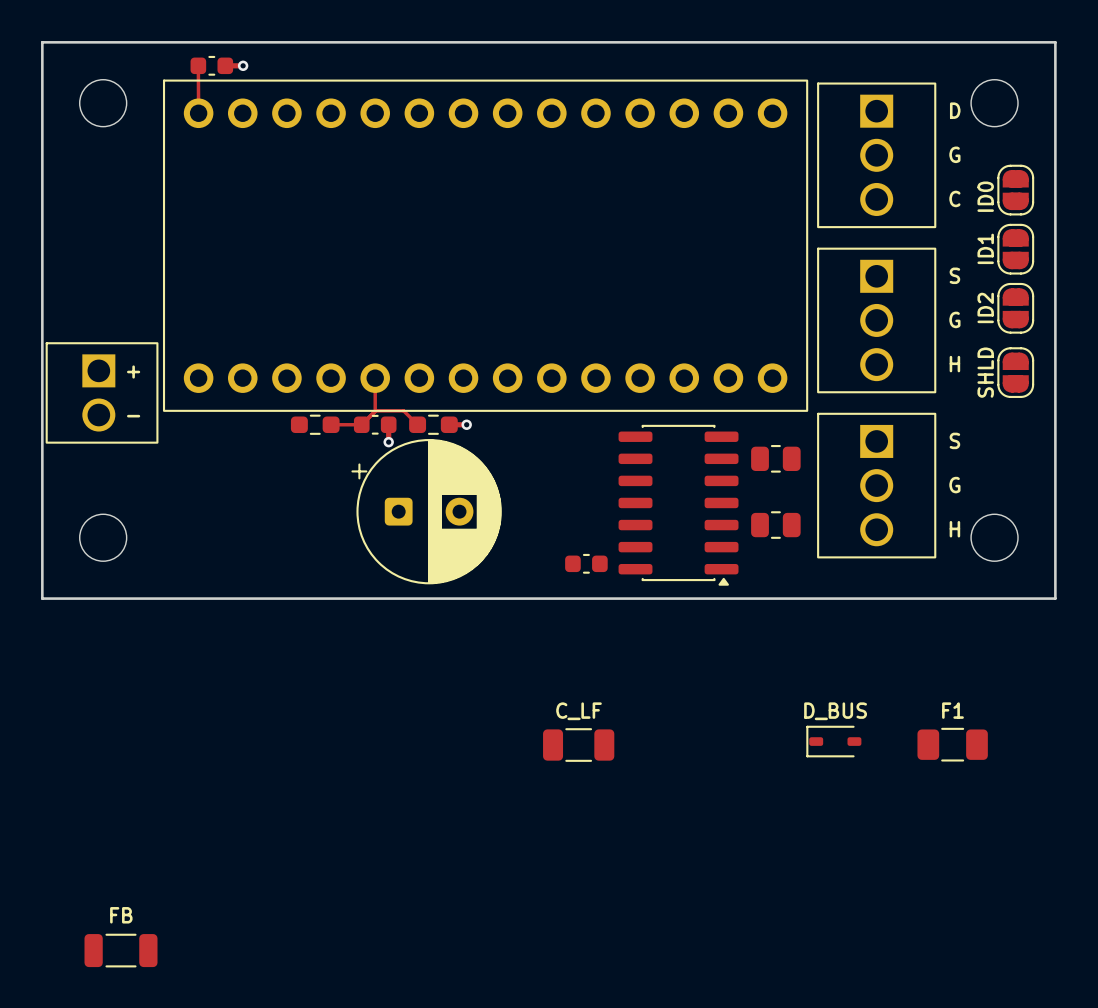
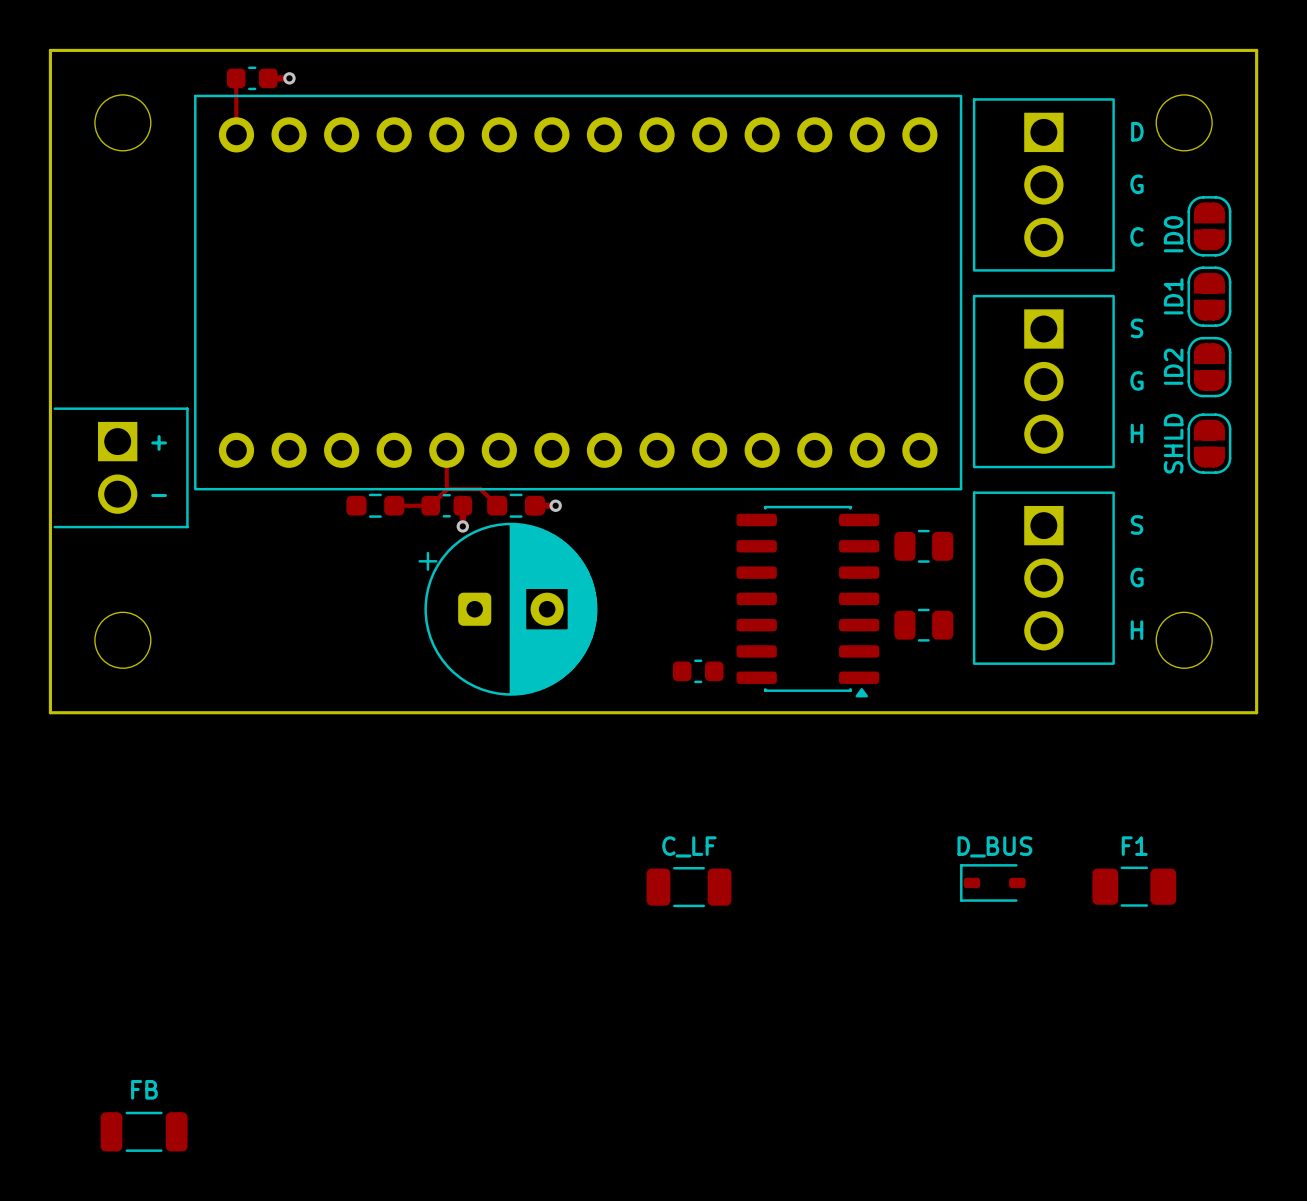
part footprint: [45, 342, 159, 444] -> [53, 407, 189, 529]

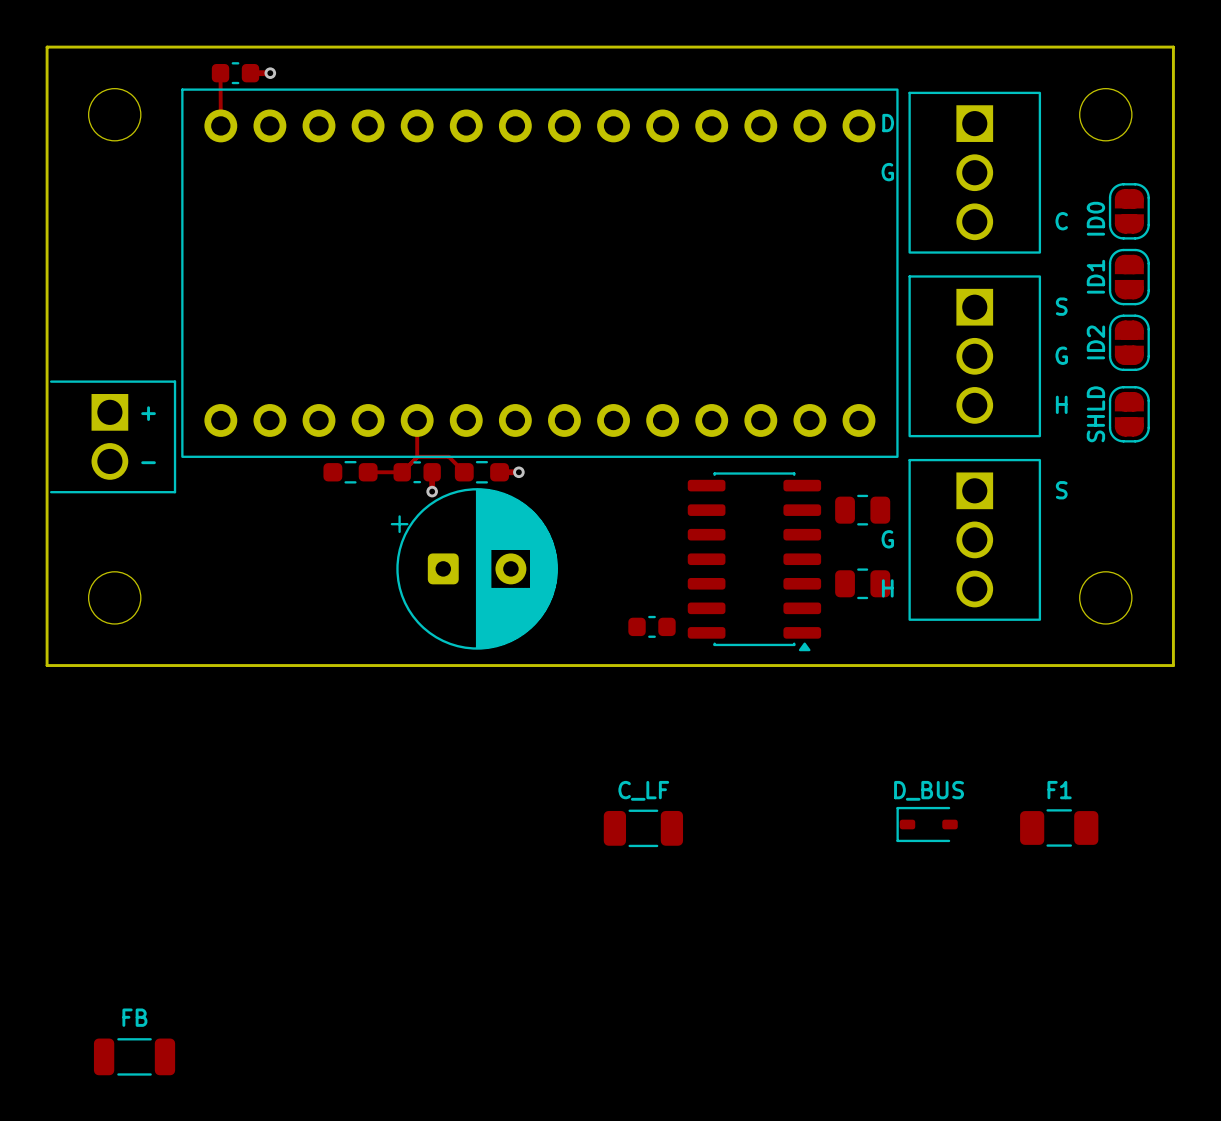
text position: D (1137, 131) -> D (888, 123)
text position: G (1137, 184) -> G (887, 172)
text position: G (1137, 577) -> G (887, 539)
text position: H (1137, 630) -> H (887, 588)

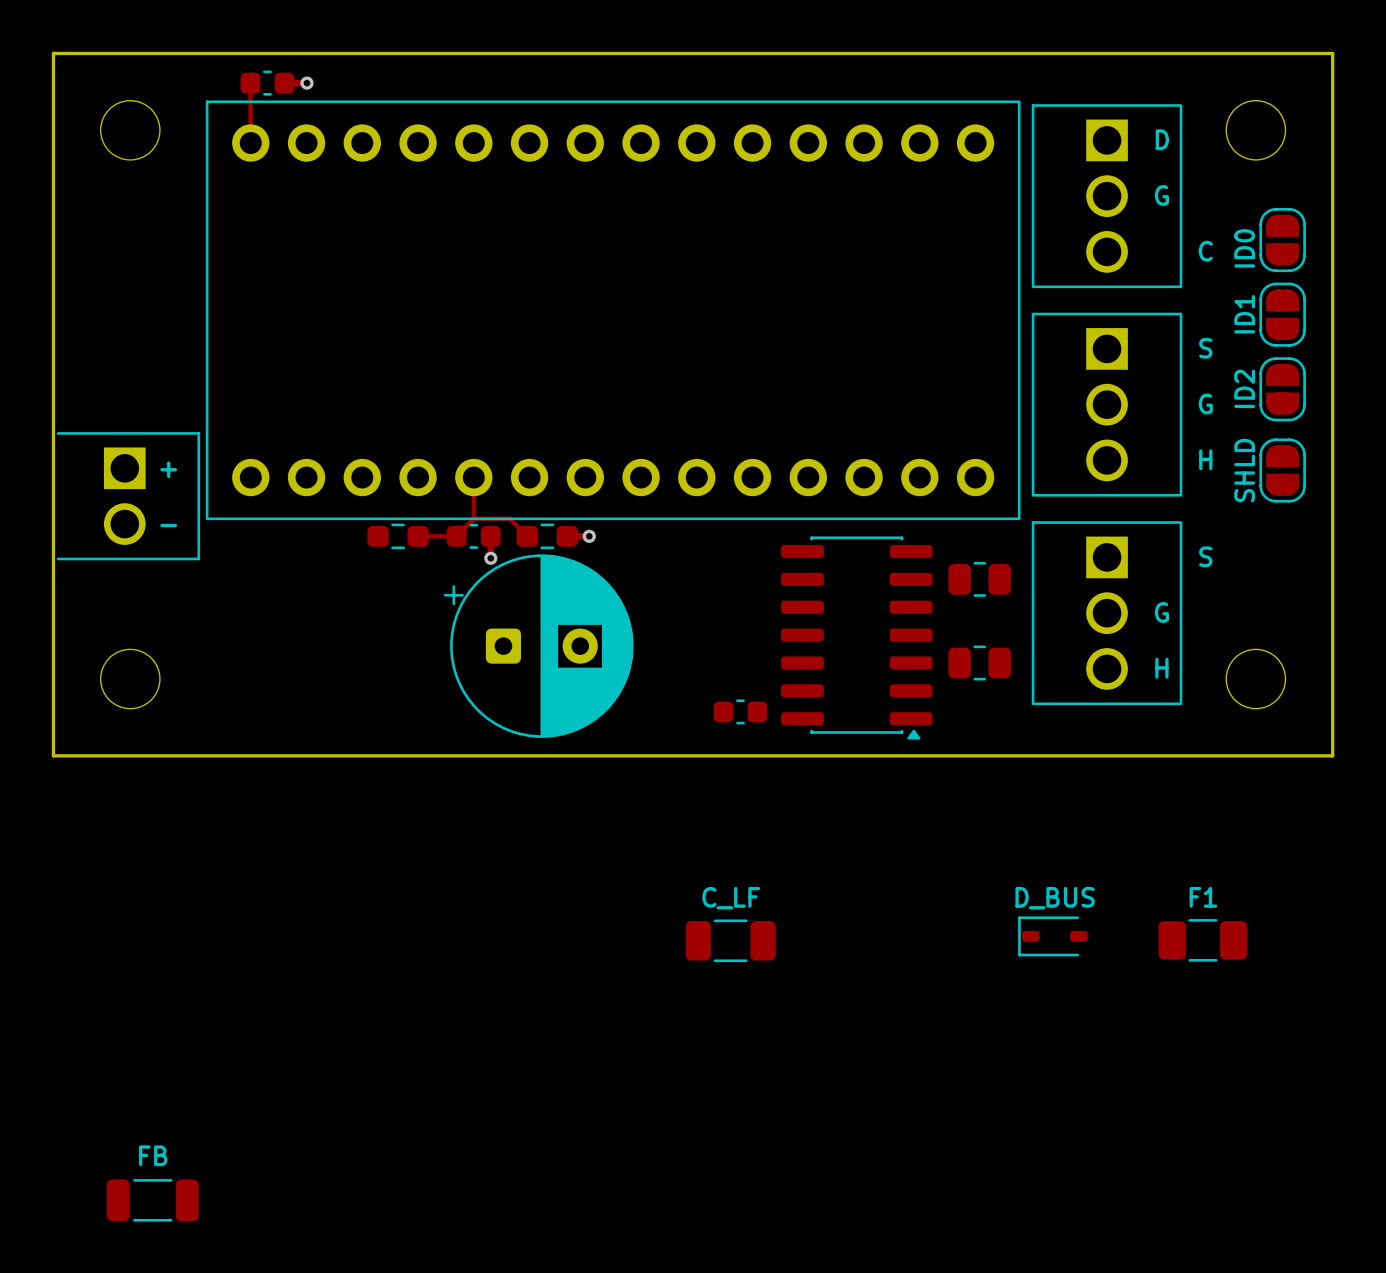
text position: D (888, 123) -> D (1162, 139)
text position: G (887, 172) -> G (1161, 195)
text position: G (887, 539) -> G (1161, 612)
text position: H (887, 588) -> H (1161, 668)

